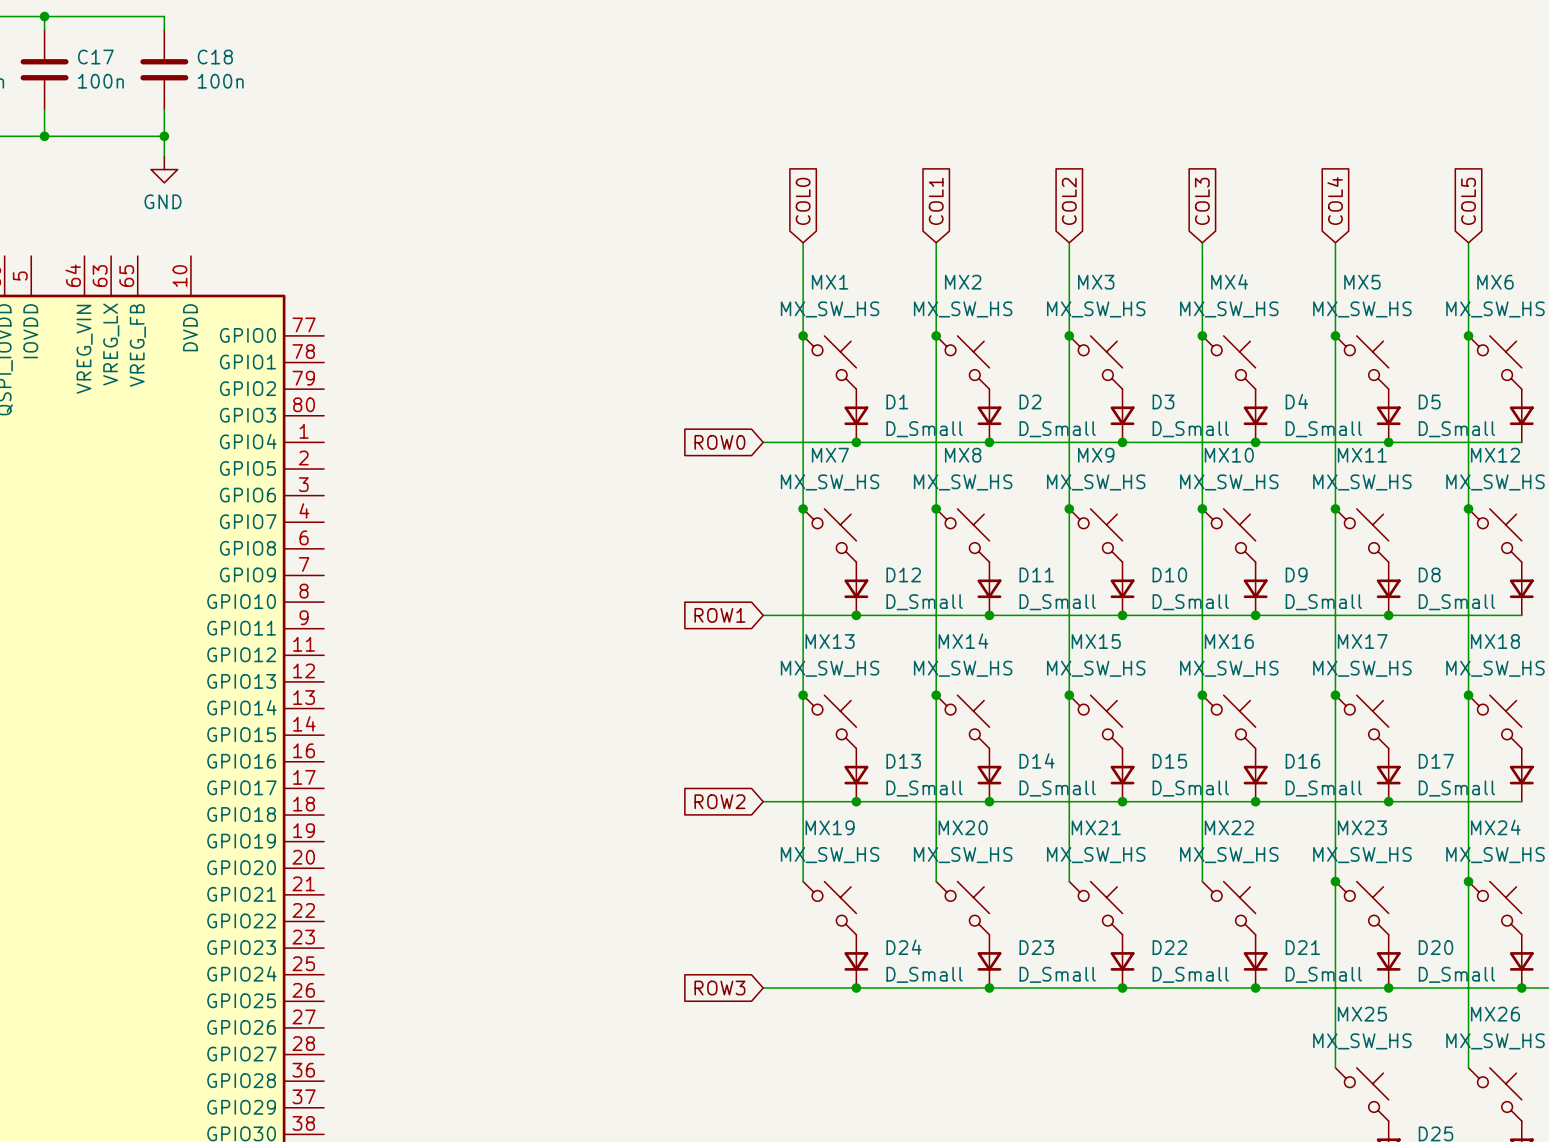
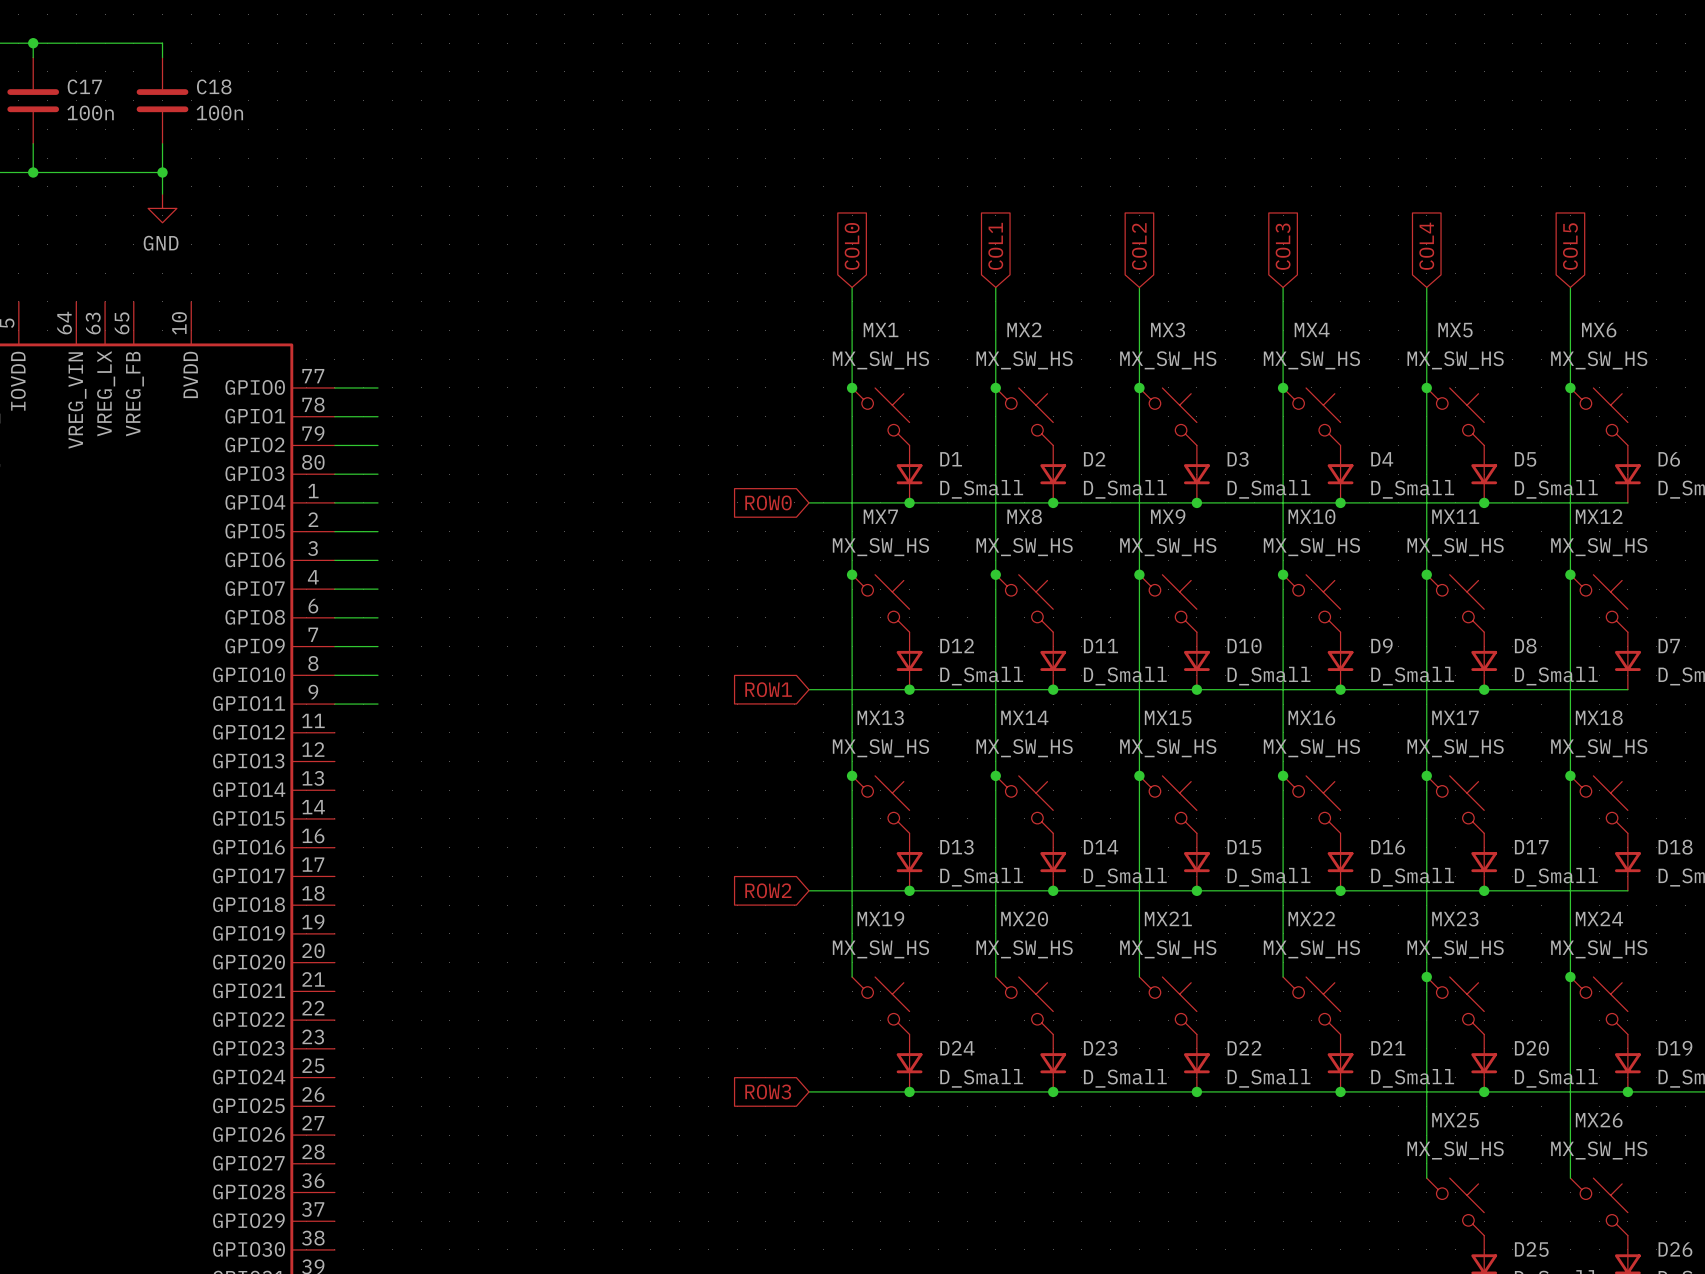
wire: none -> (334, 387) (378, 387)
wire: none -> (334, 416) (378, 416)
wire: none -> (334, 445) (378, 445)
wire: none -> (334, 474) (378, 474)
wire: none -> (334, 502) (378, 502)
wire: none -> (334, 531) (378, 531)
wire: none -> (334, 560) (378, 560)
wire: none -> (334, 589) (378, 589)
wire: none -> (334, 617) (378, 617)
wire: none -> (334, 646) (378, 646)
wire: none -> (334, 675) (378, 675)
wire: none -> (334, 704) (378, 704)

